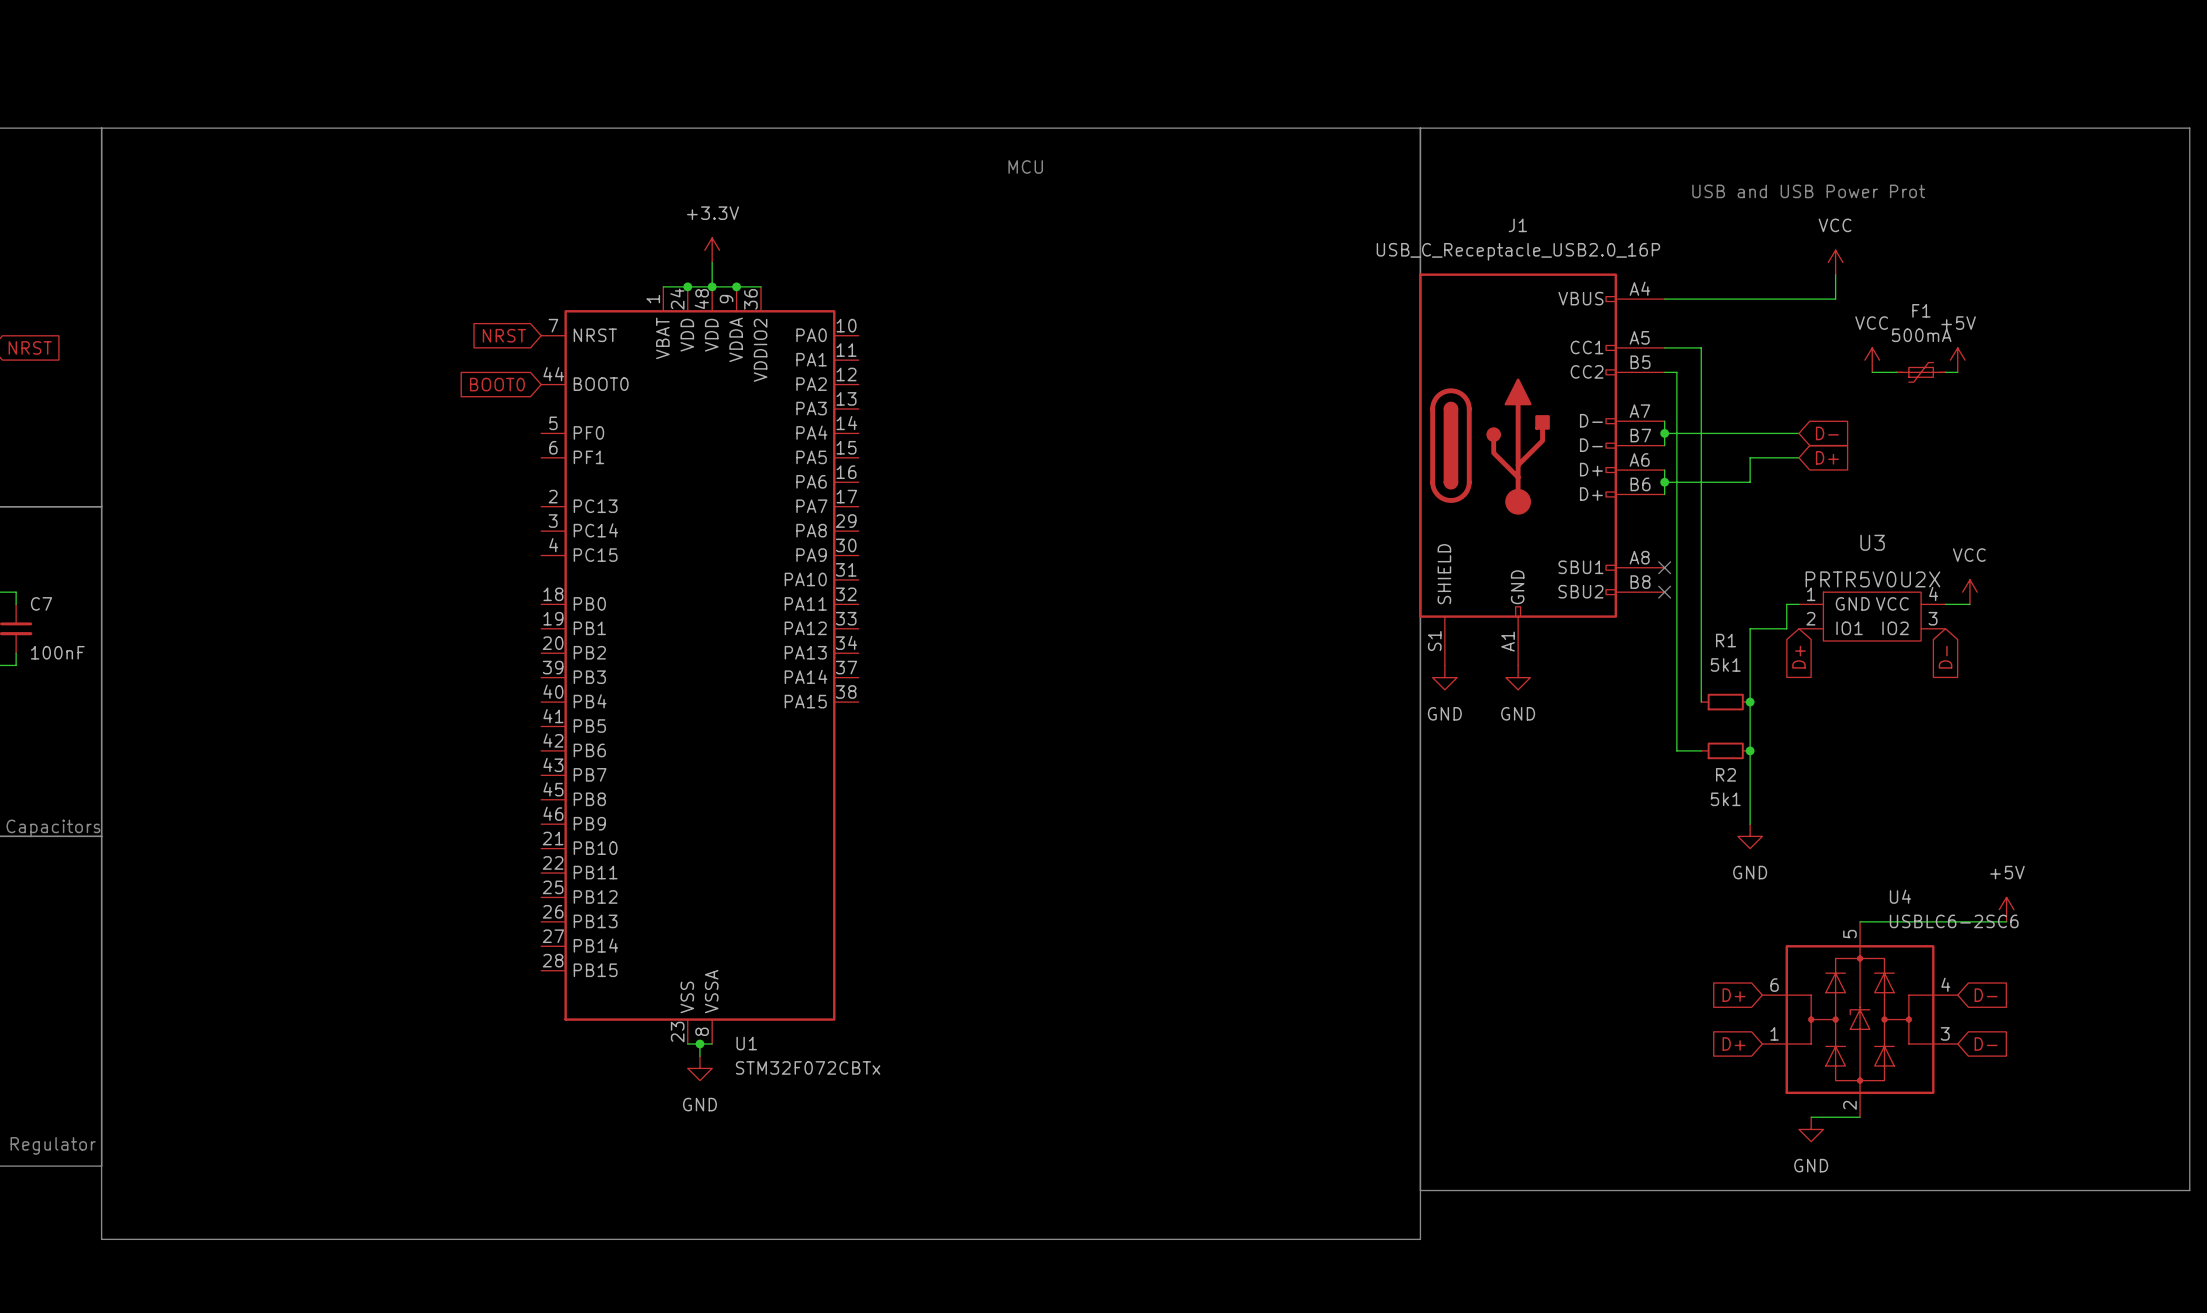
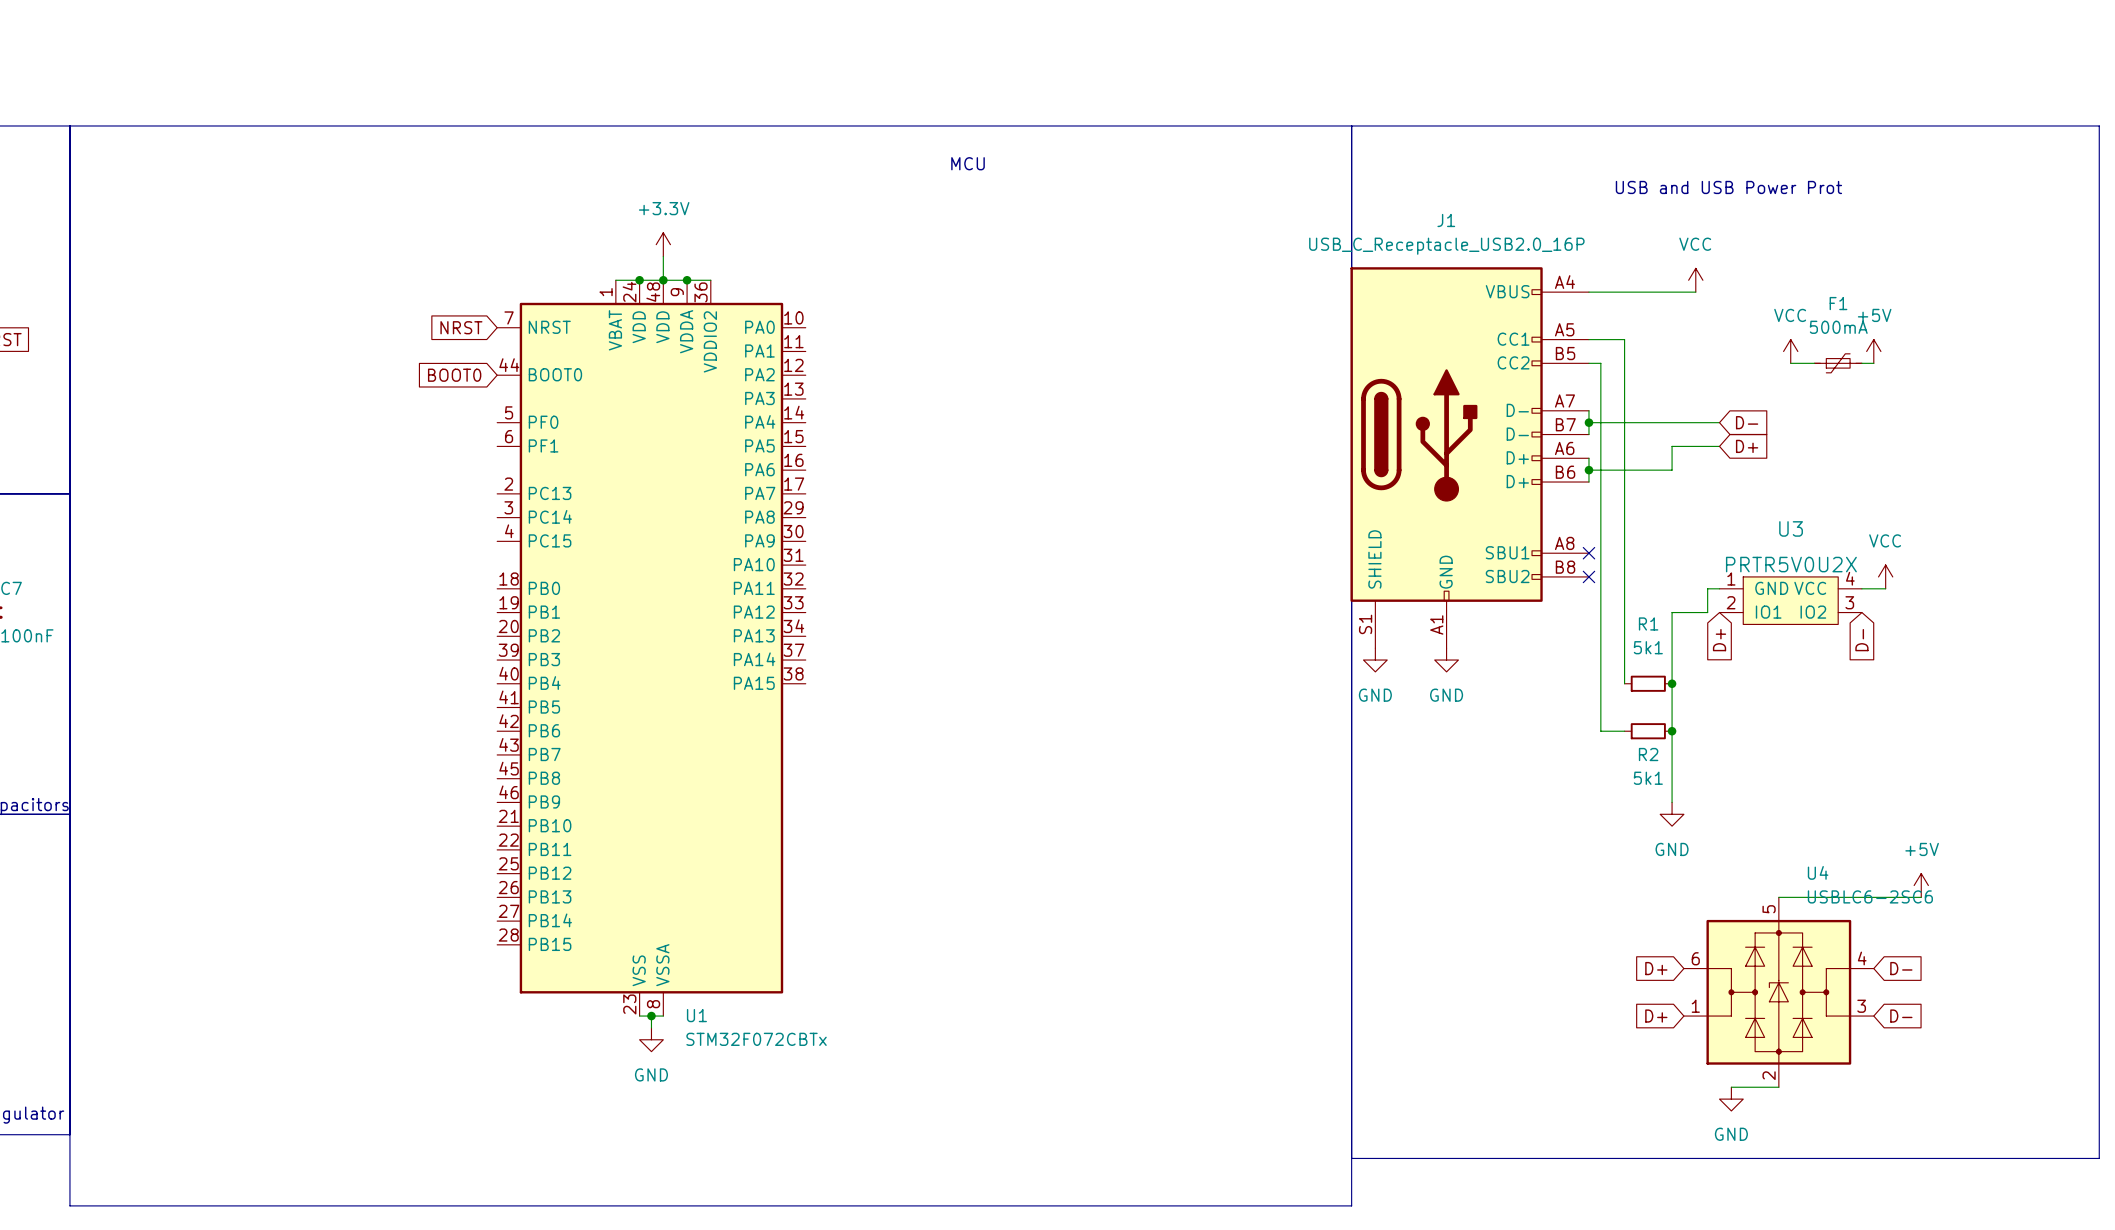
power symbol position: VCC (1835, 262) -> VCC (1695, 280)
wire: (1835, 274) (1835, 299) (1774, 299) -> none

